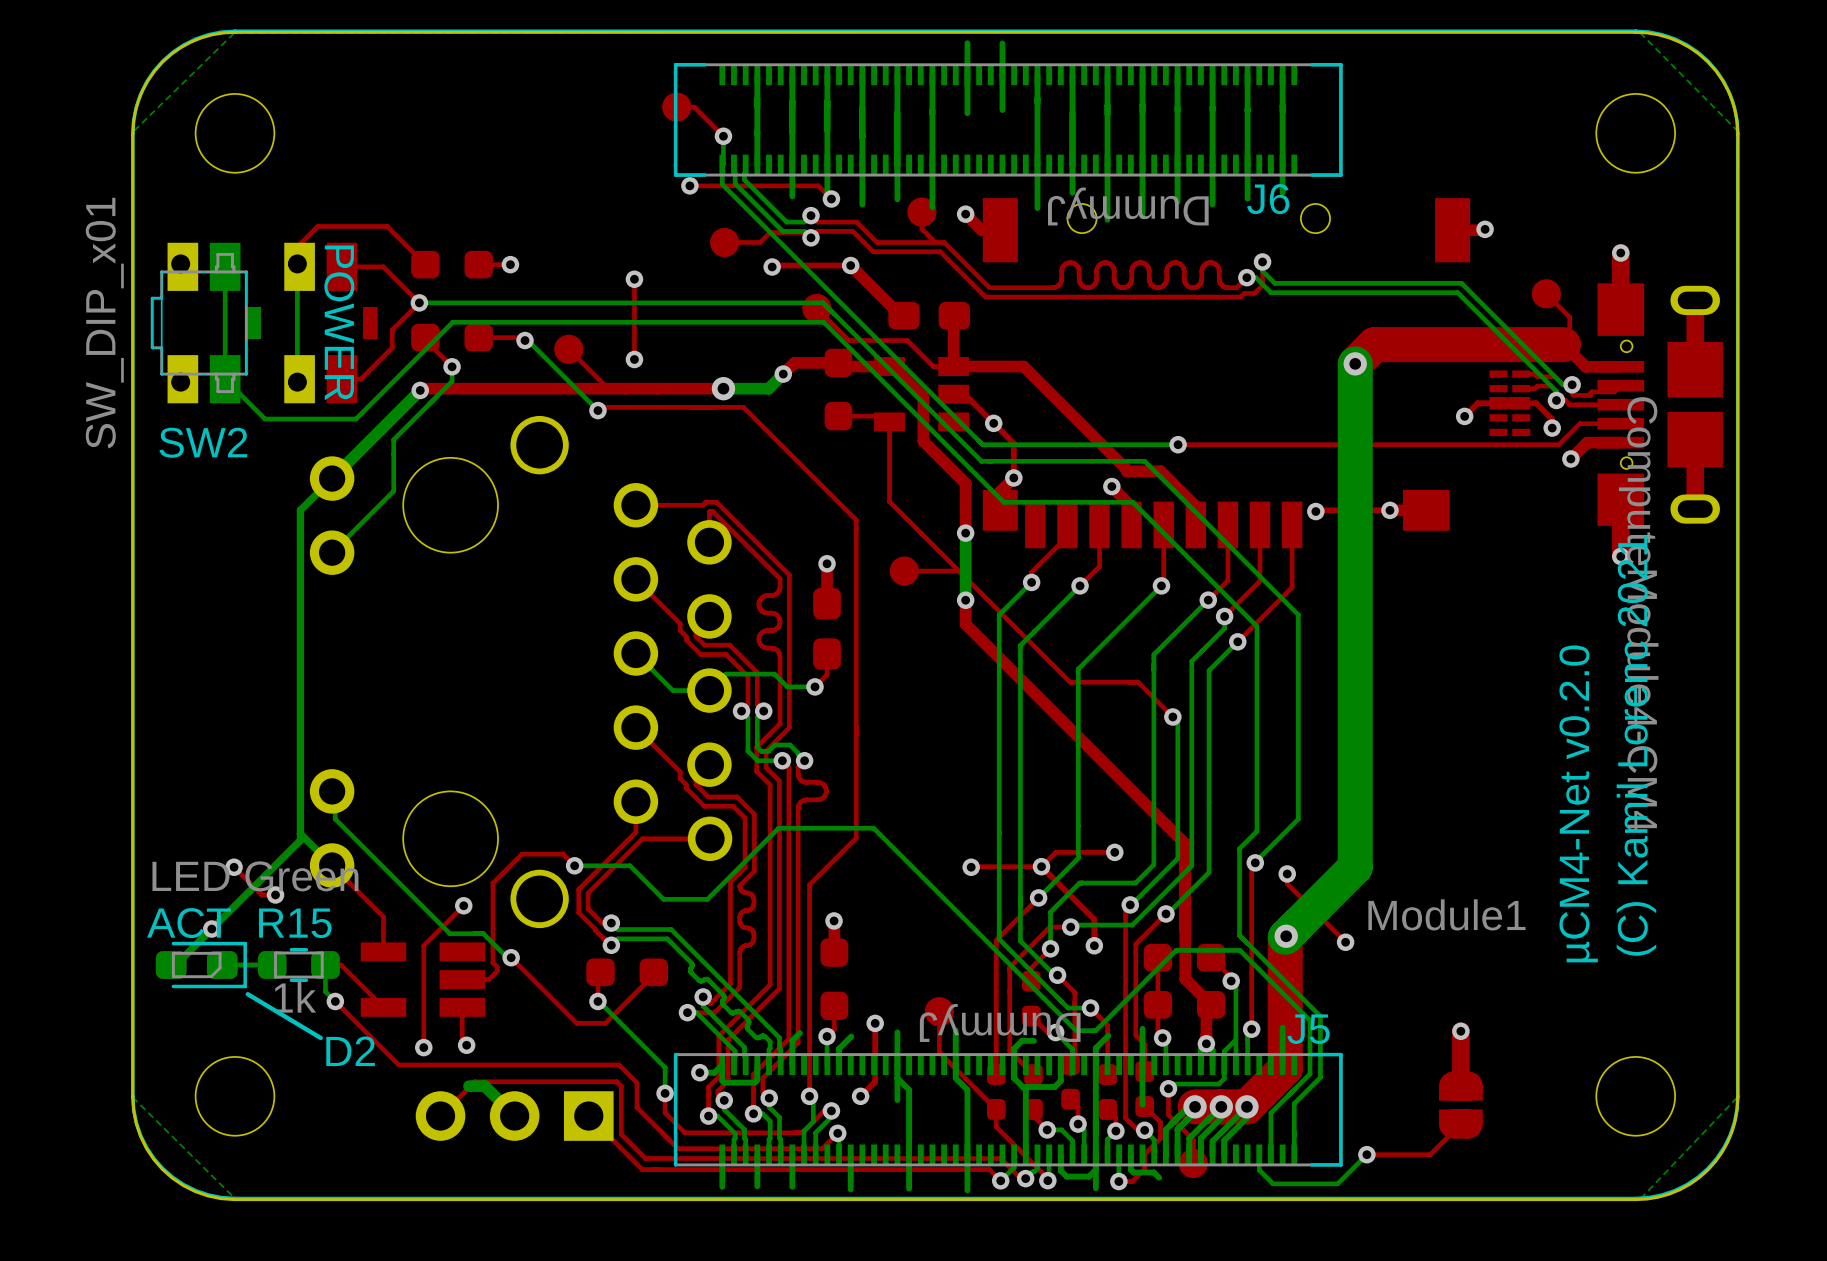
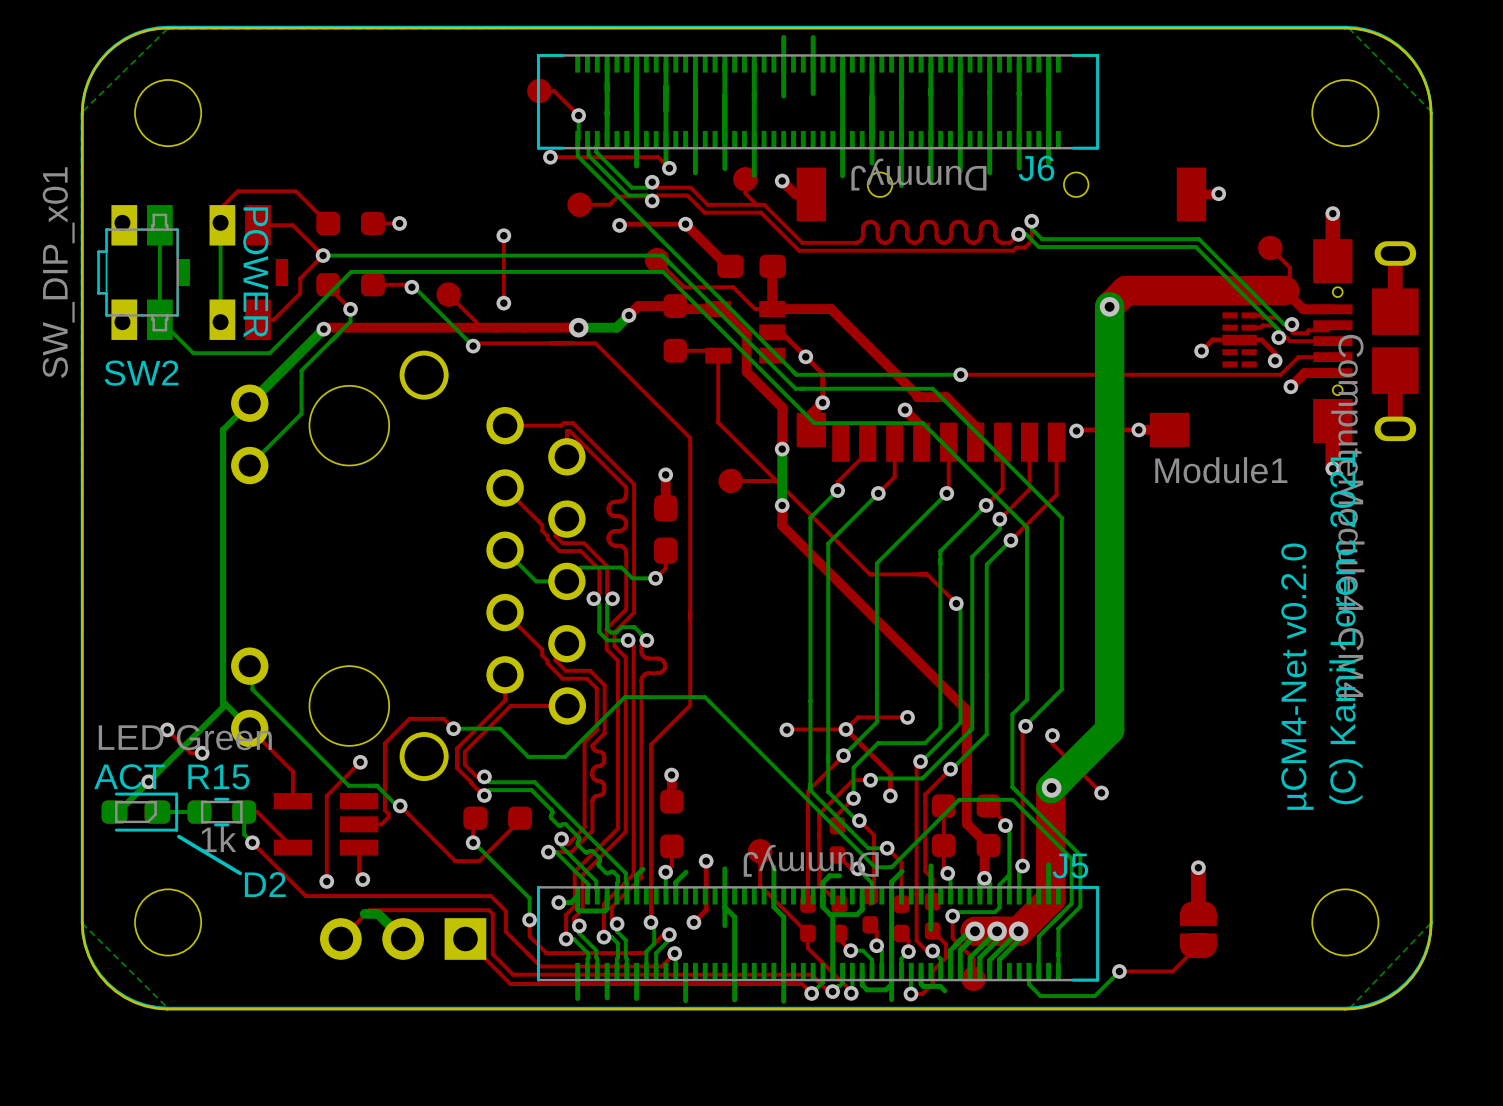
Module1 name position: Module1 (1446, 914) -> Module1 (1221, 470)

